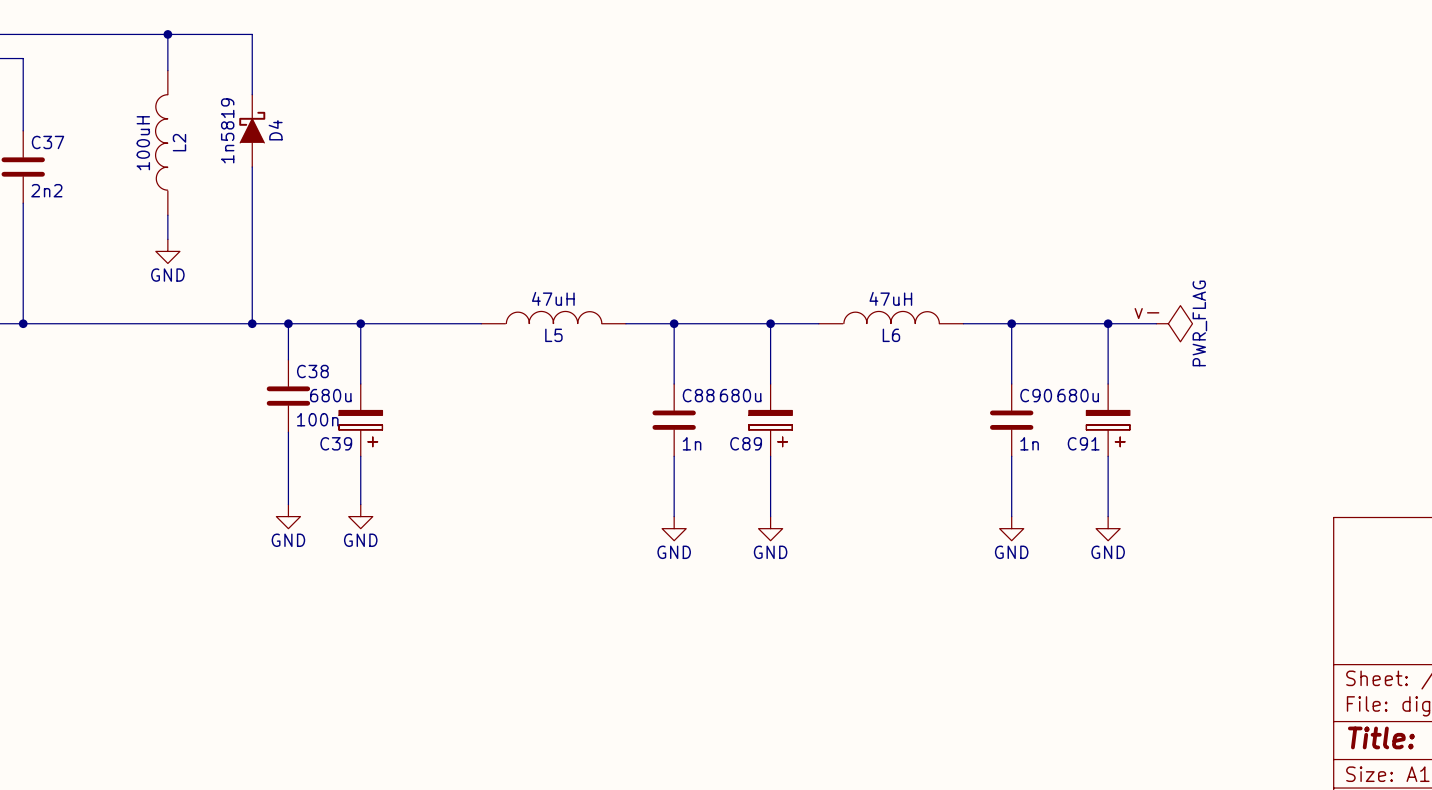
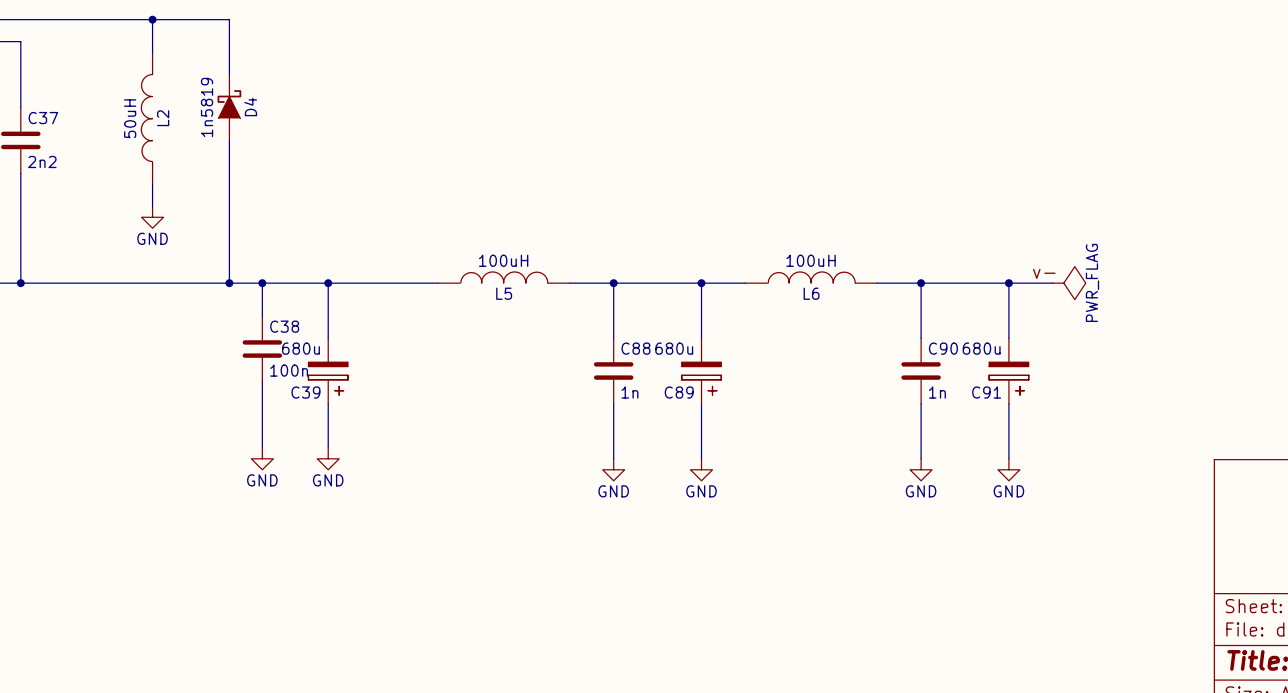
L2 value: 100uH (143, 143) -> 50uH (130, 118)
L5 value: 47uH (553, 298) -> 100uH (503, 260)
L6 value: 47uH (890, 298) -> 100uH (811, 260)

